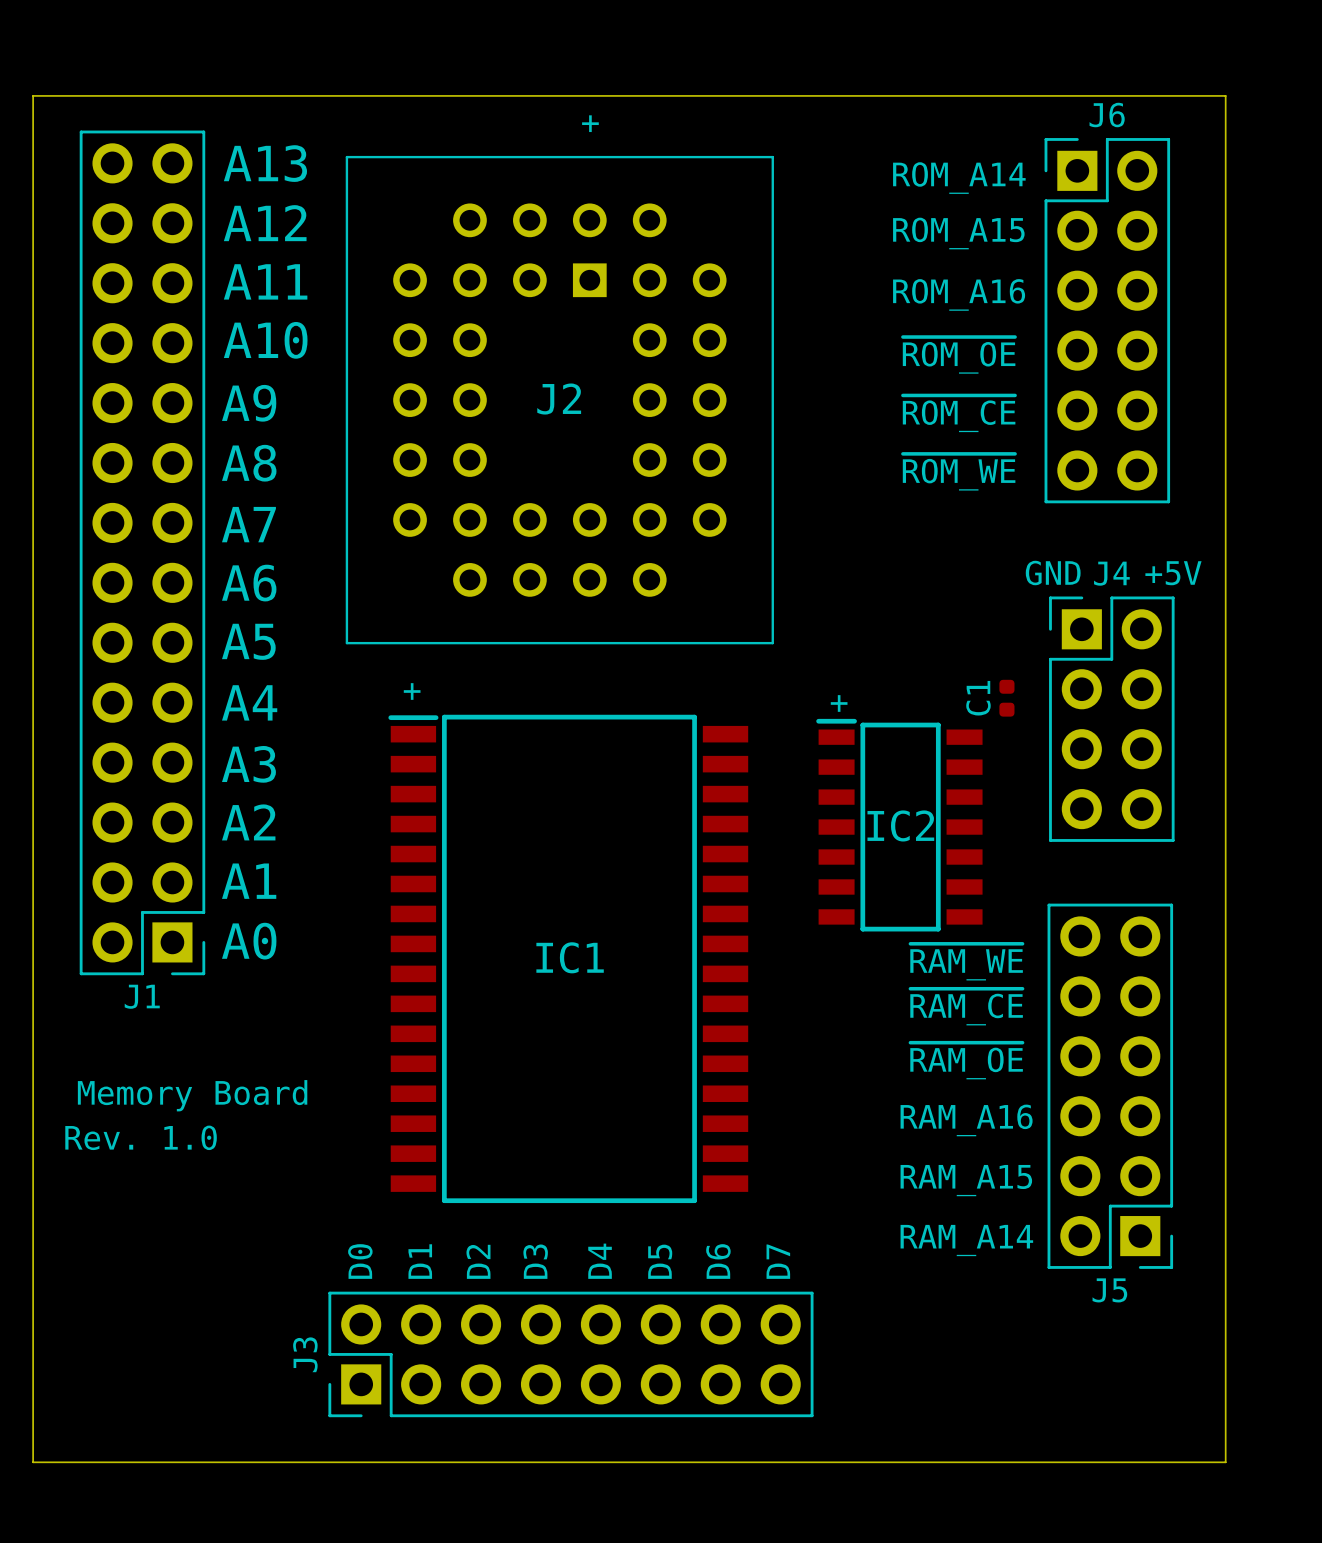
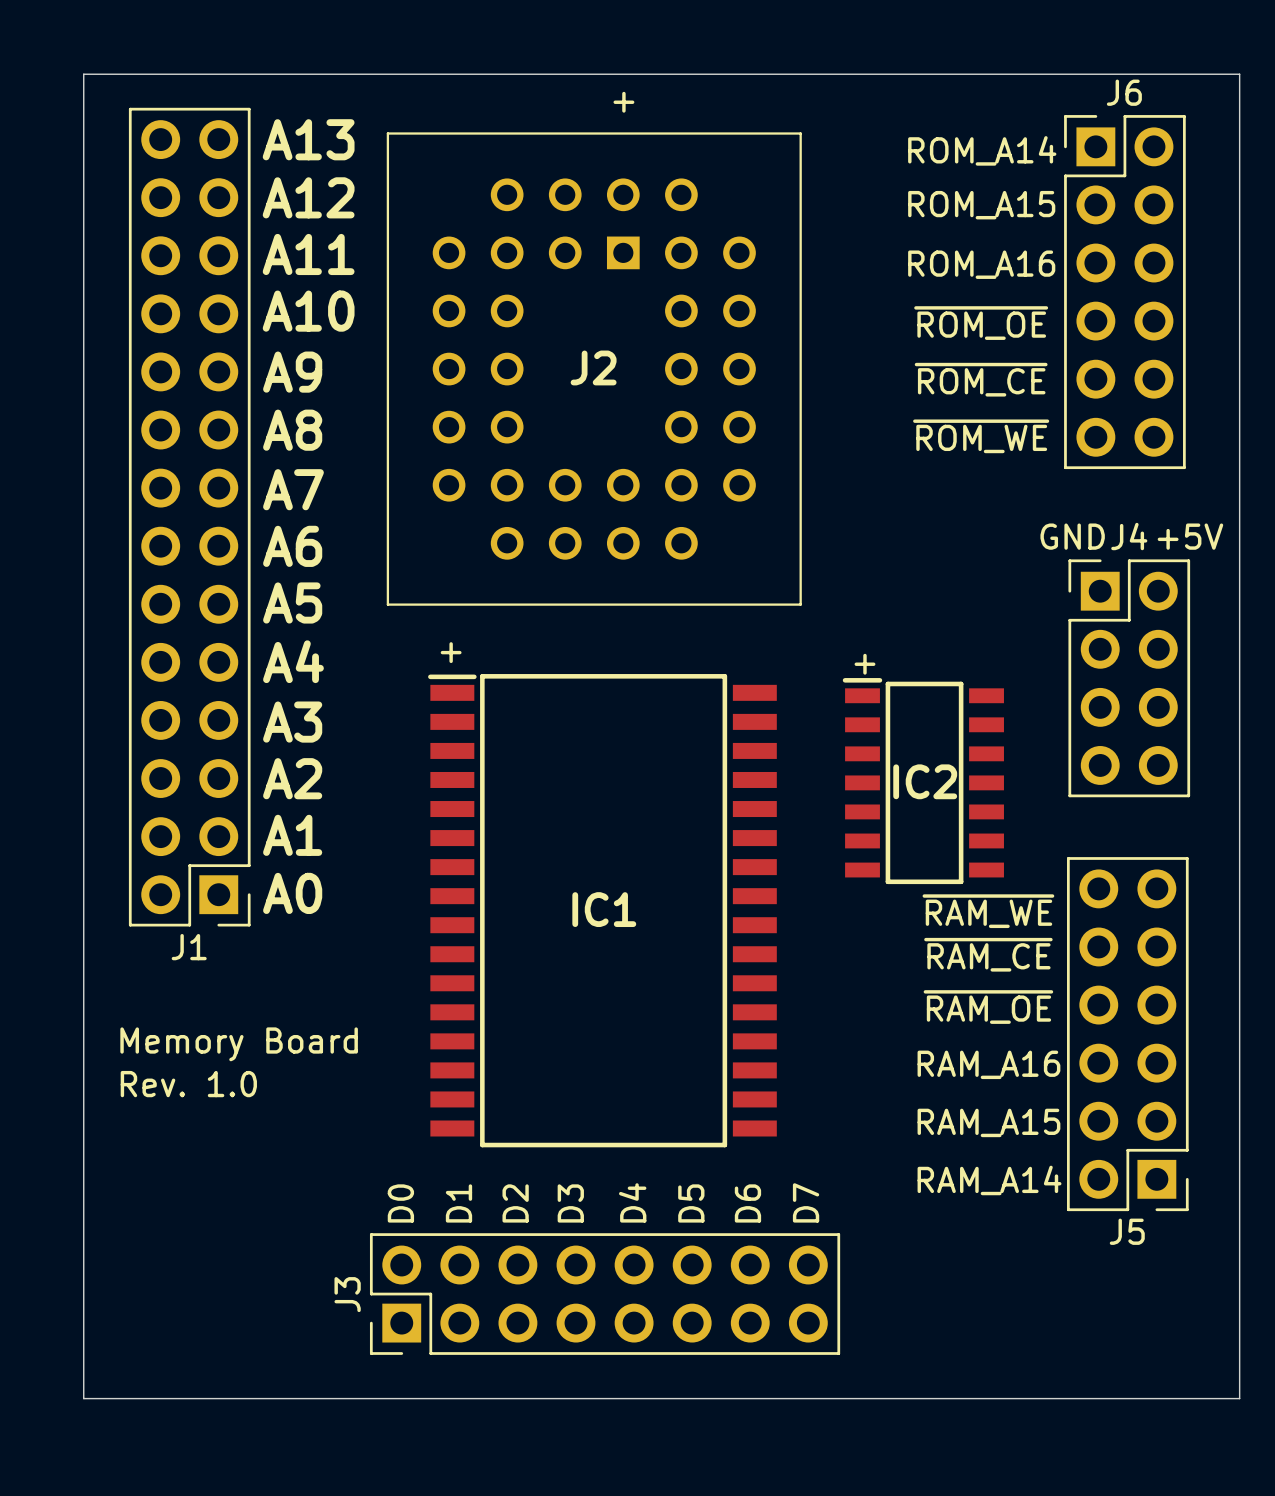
C1: (1006, 698) -> none

